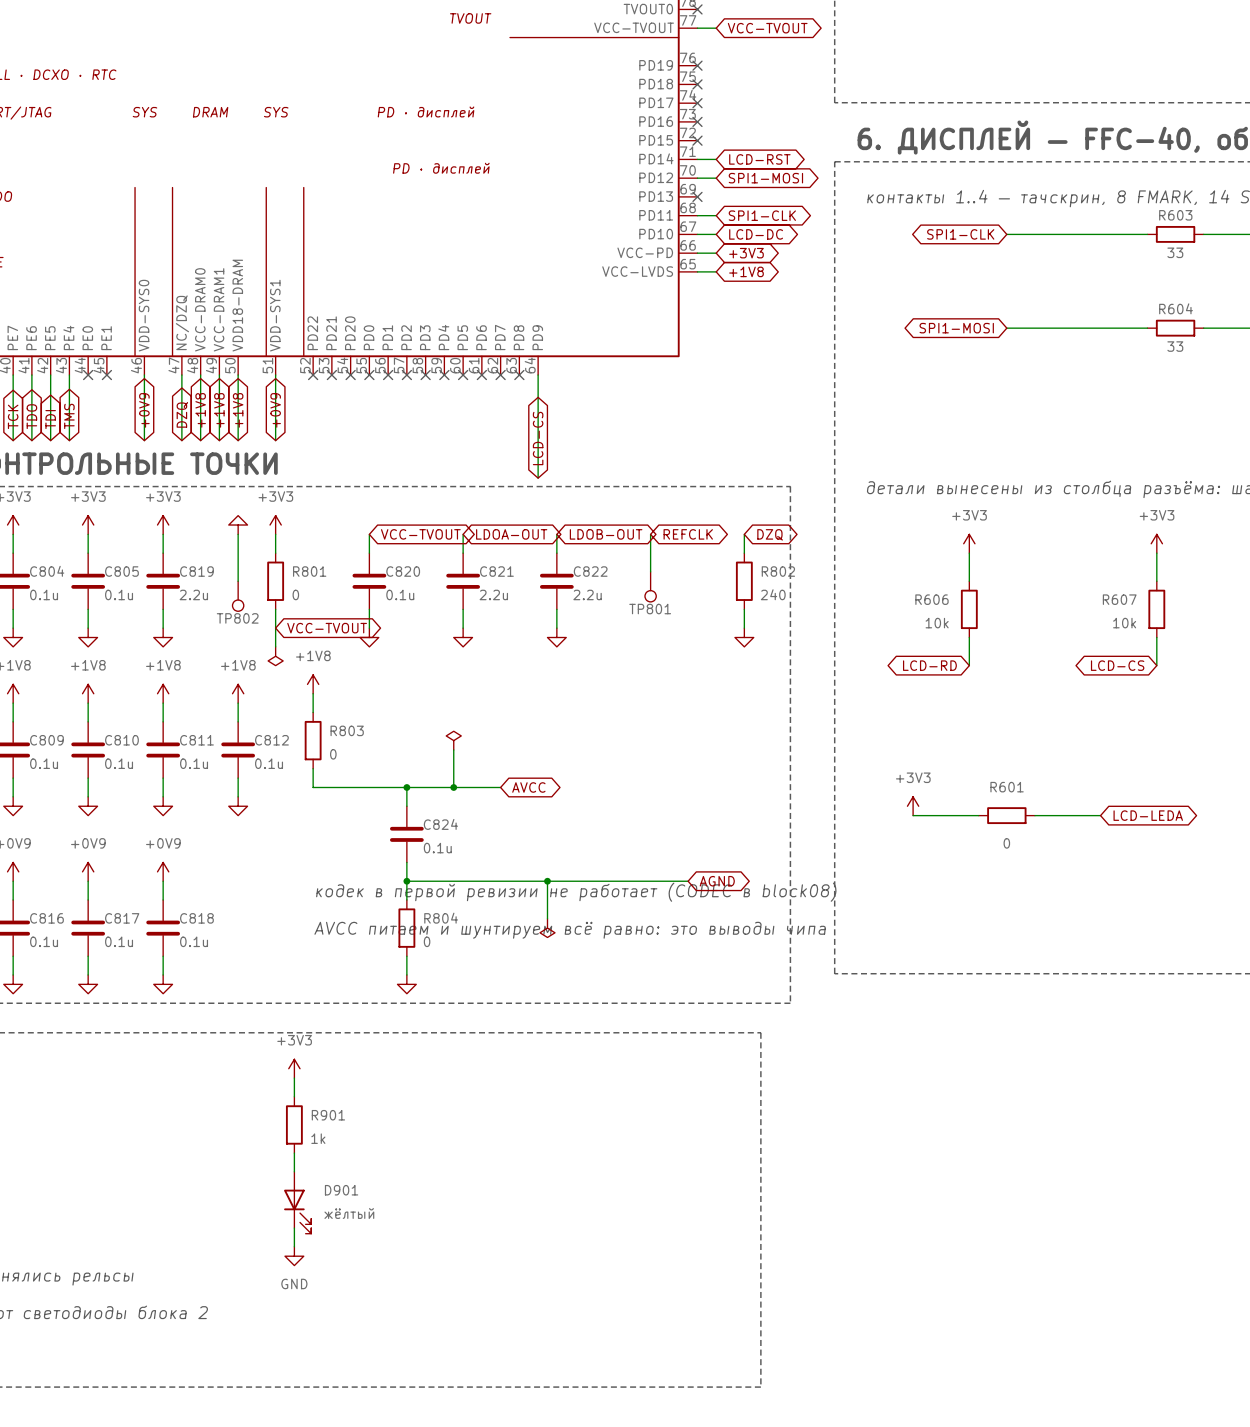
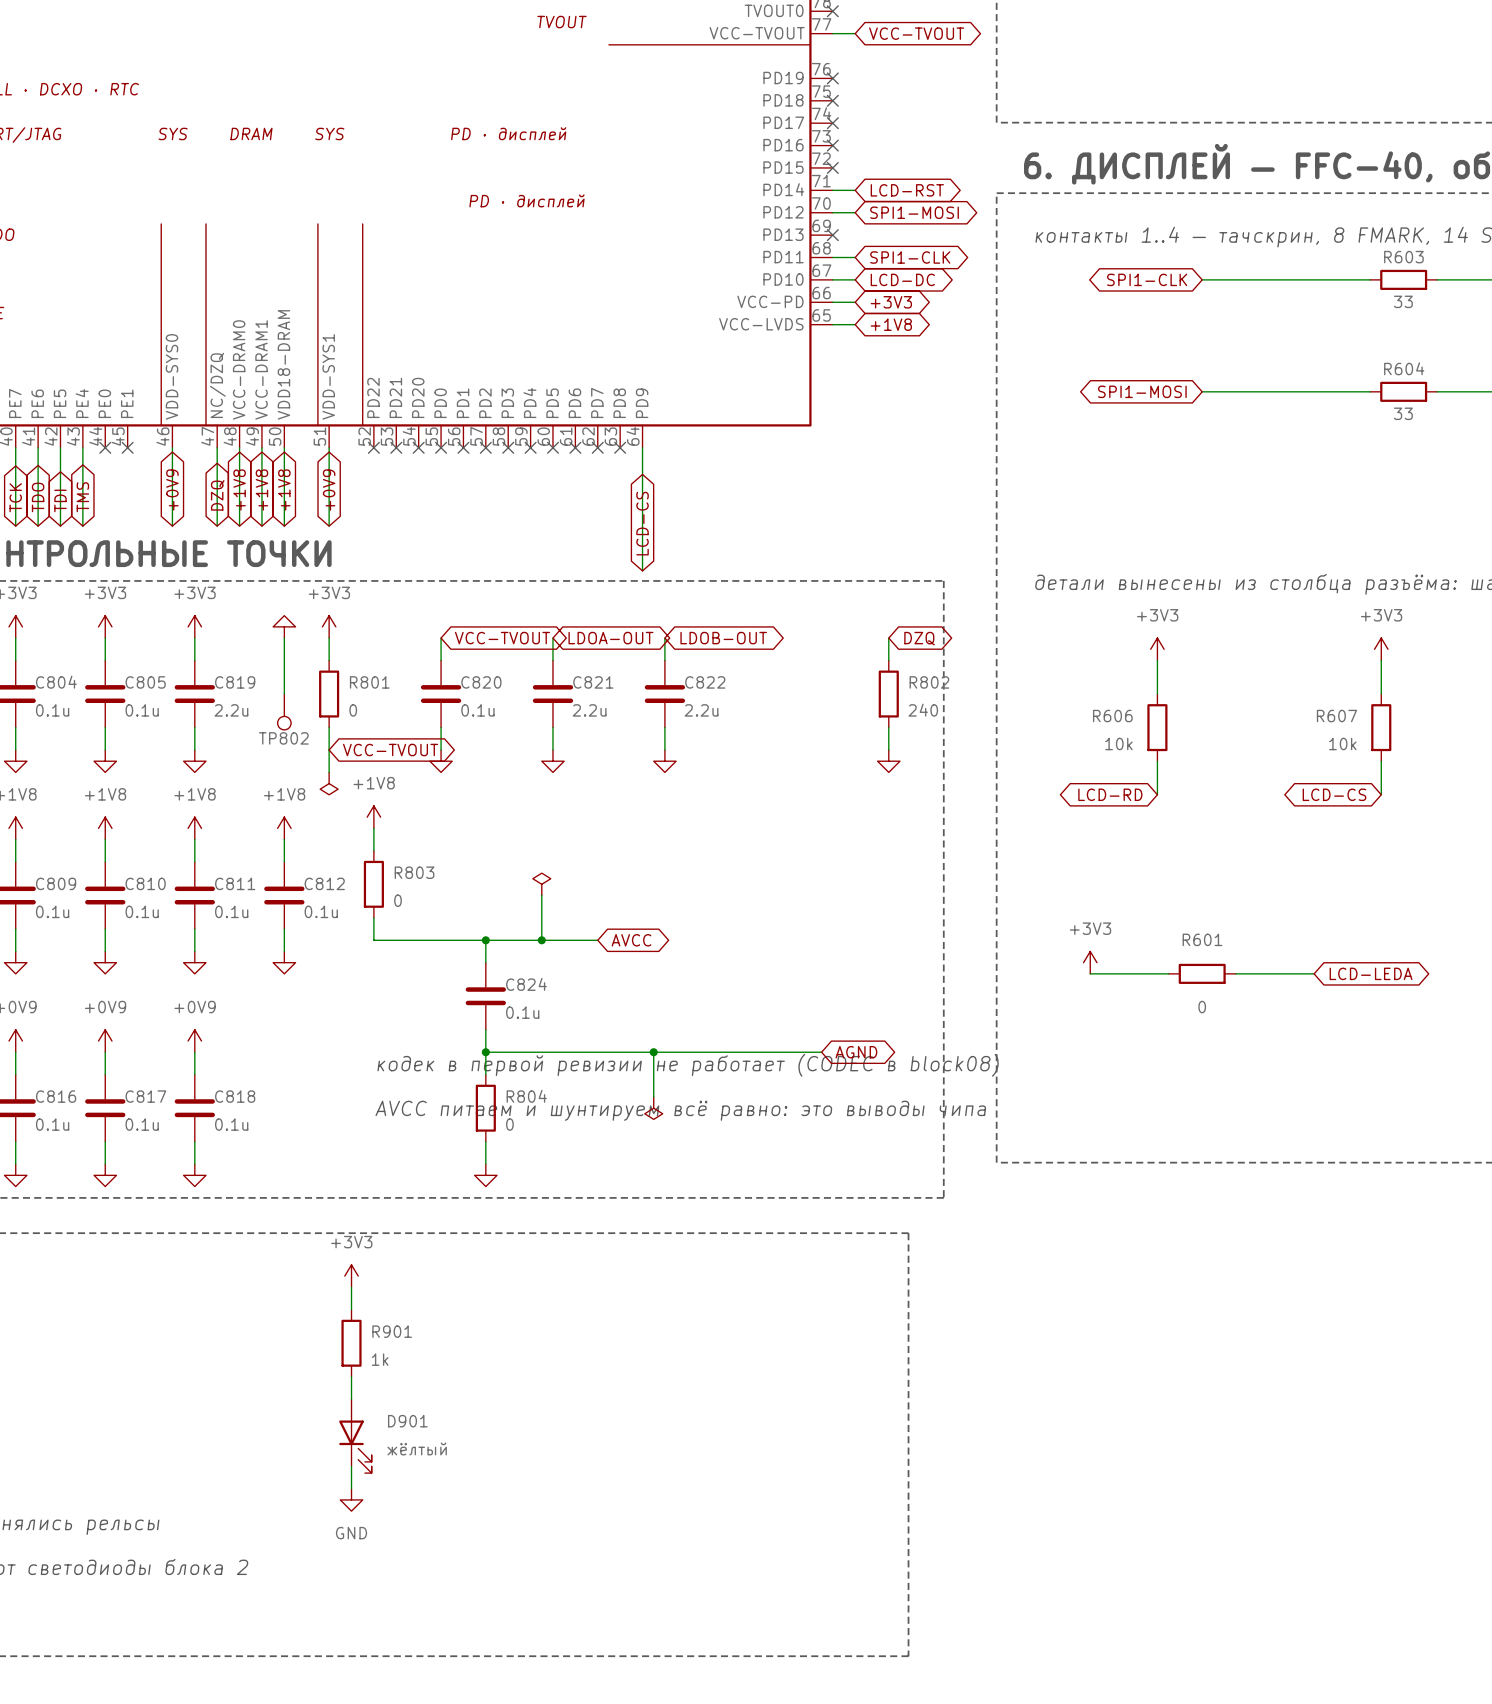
wire: (650, 534) (650, 571) -> none
global label: REFCLK (688, 534) -> none
TP801: (650, 586) -> none

